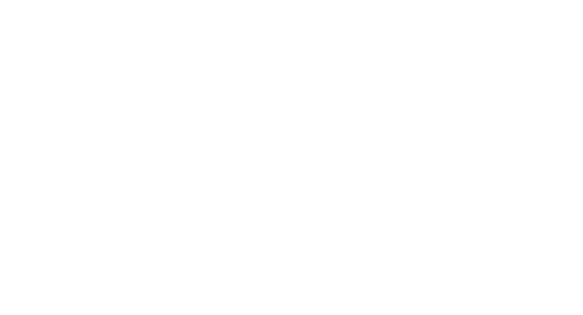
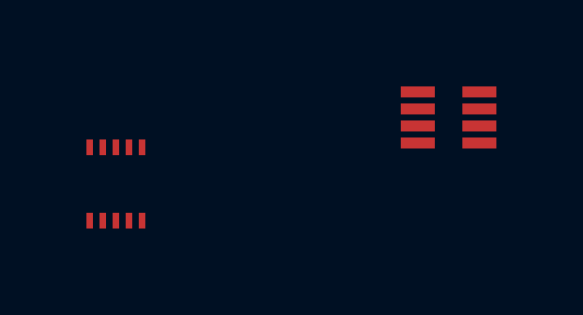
part: none -> (448, 117)
part: none -> (115, 183)

